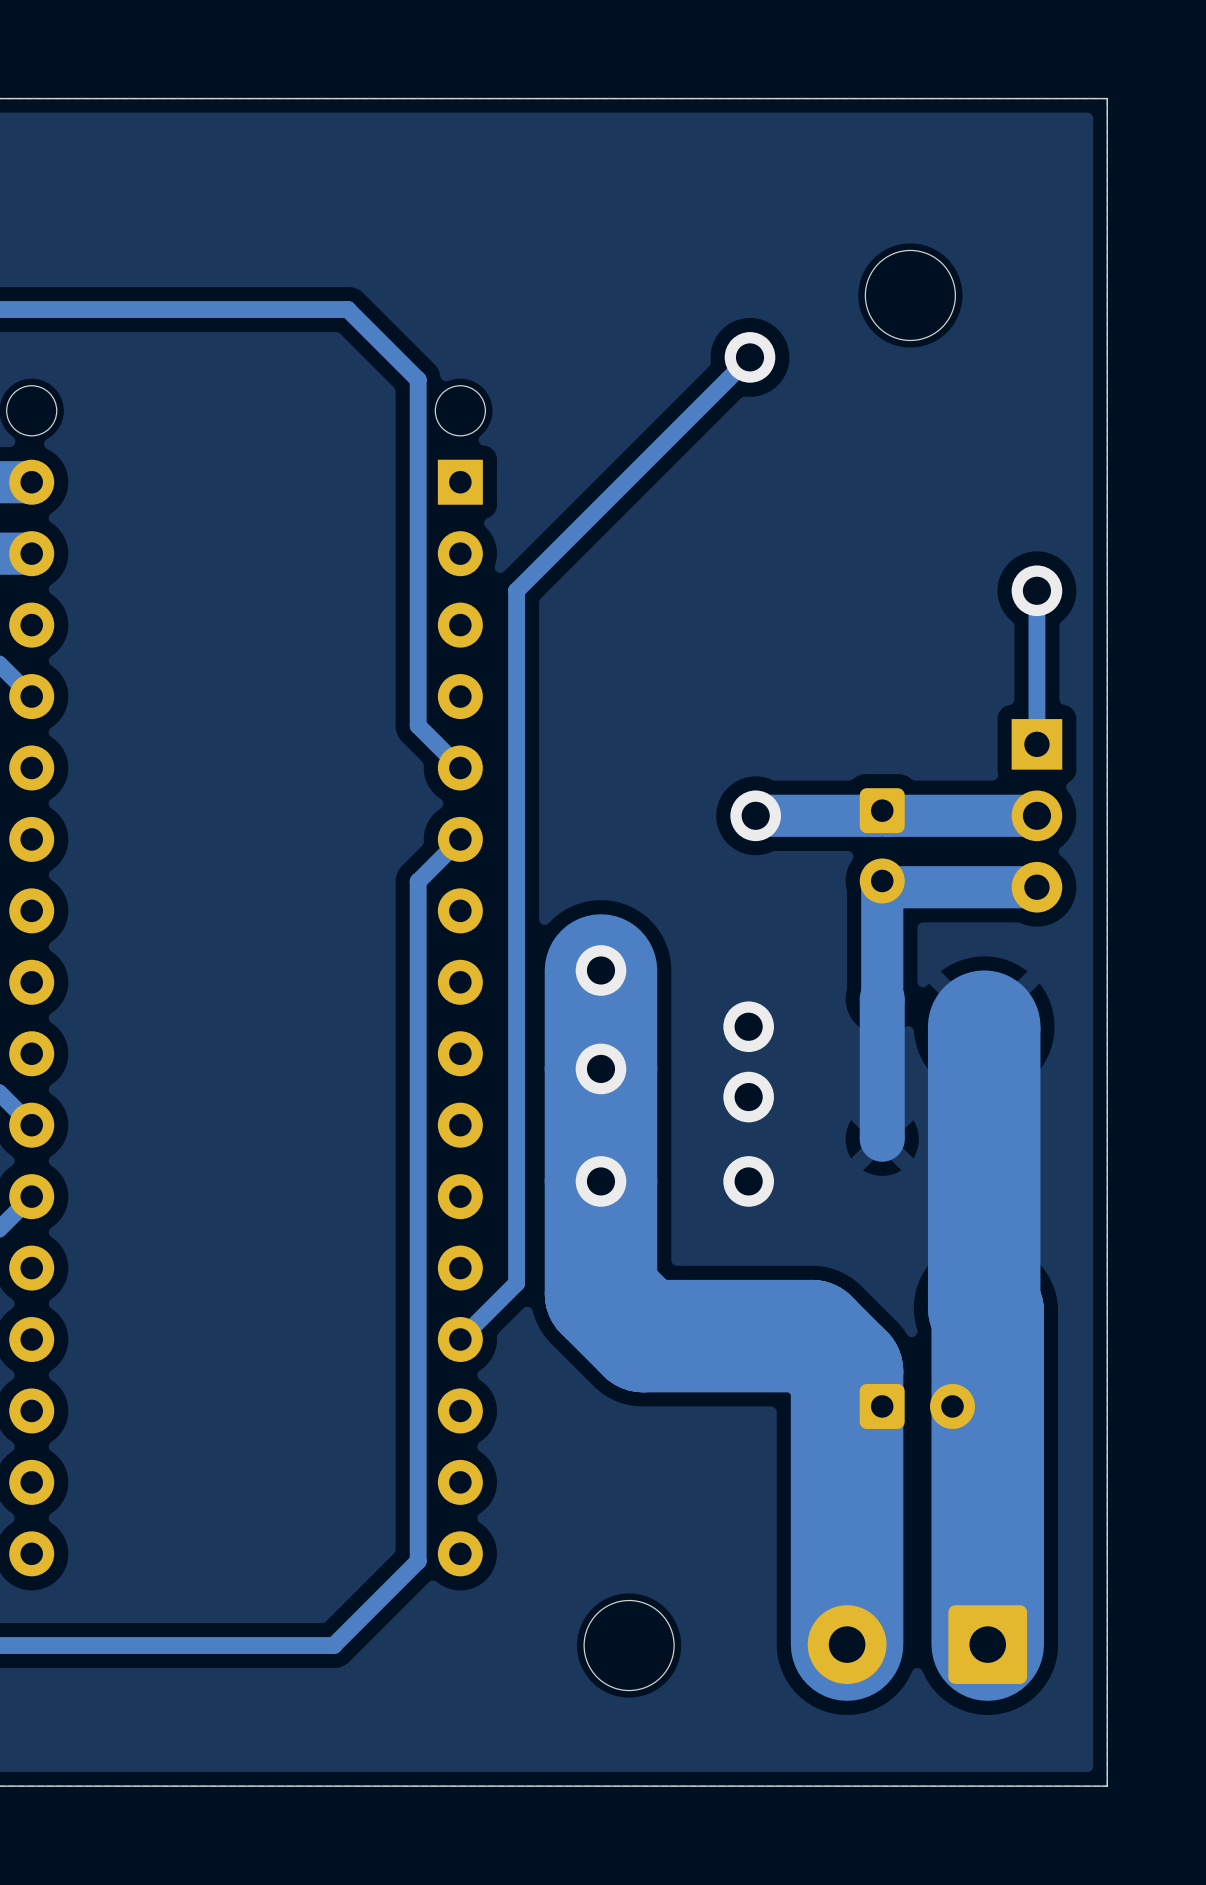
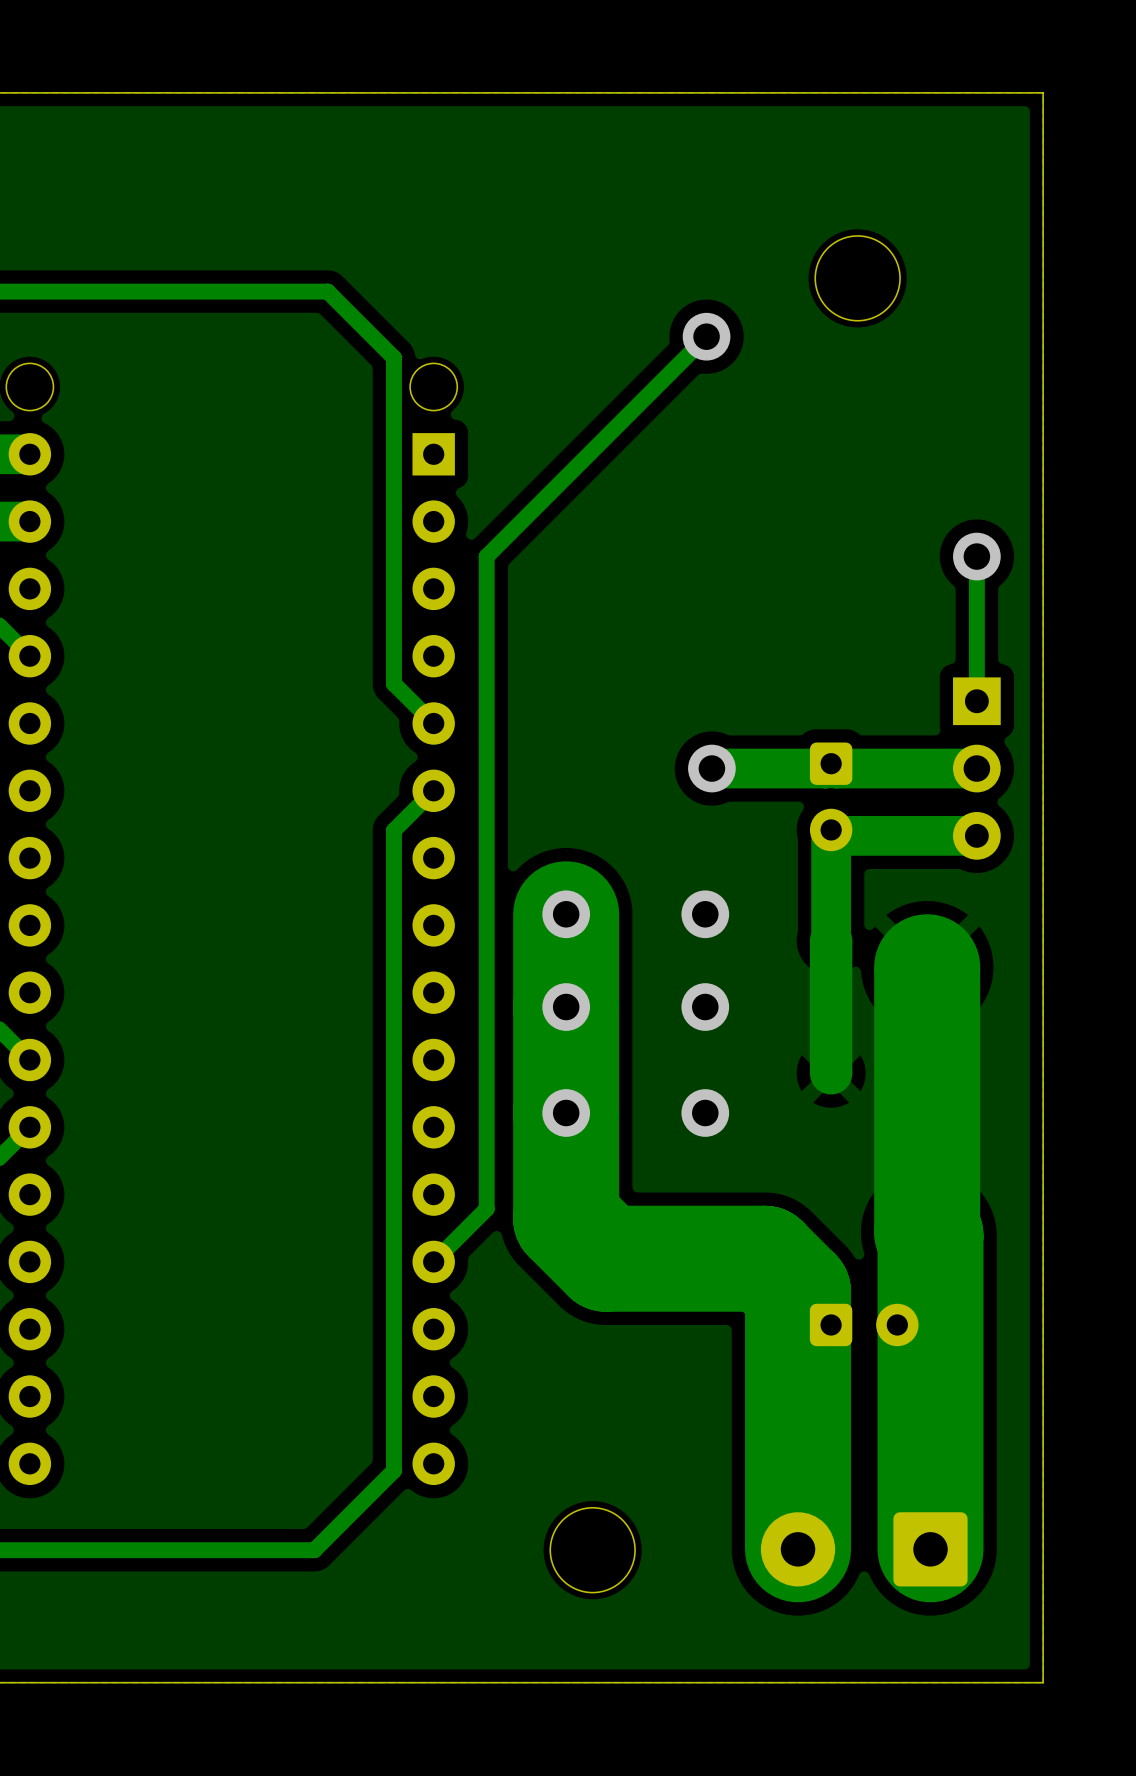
via: none -> (705, 914)
via: (748, 1026) -> none
via: none -> (705, 1007)
via: (748, 1097) -> none

